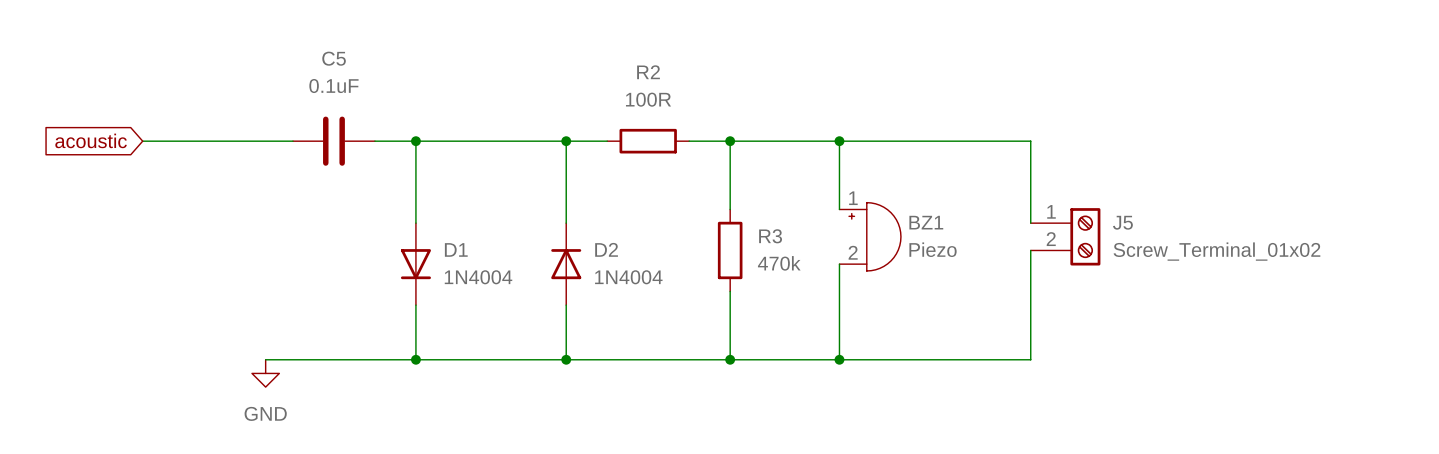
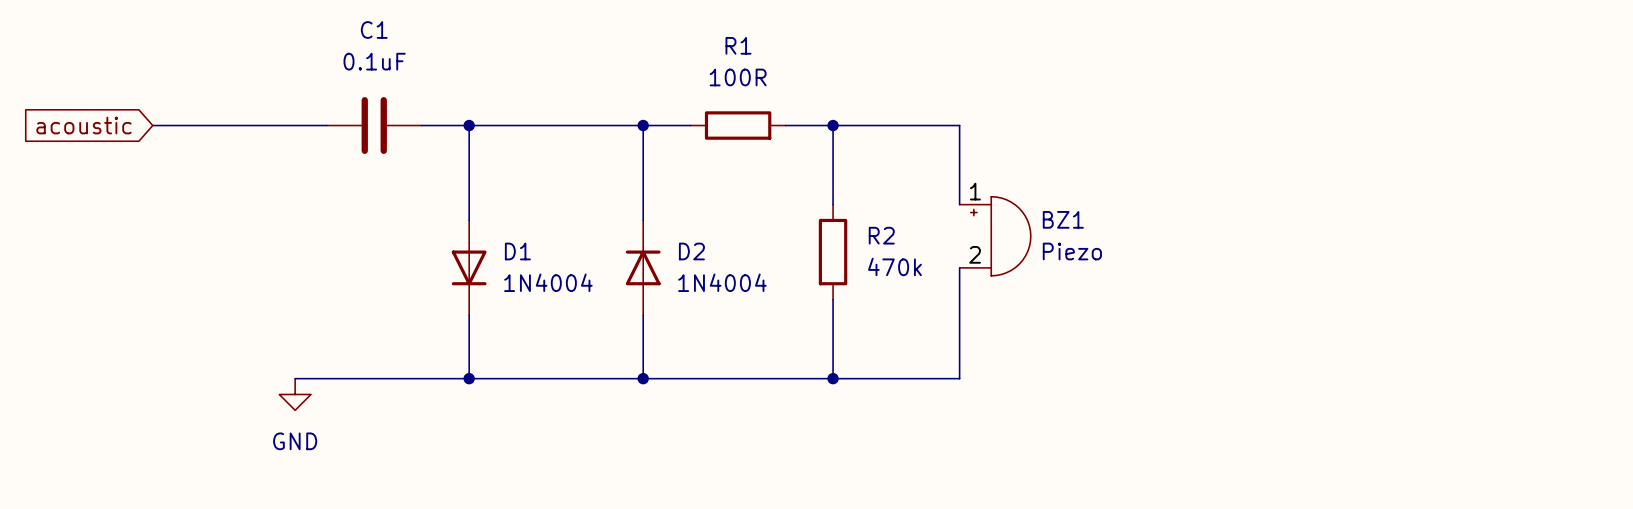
C5 name: C5 (334, 58) -> C1 (374, 30)
R2 name: R2 (648, 72) -> R1 (738, 45)
wire: (839, 141) (1030, 141) (1030, 223) -> none
junction: (839, 141) -> none
R3 name: R3 (770, 236) -> R2 (881, 235)
J5: Screw_Terminal_01x02 (1065, 236) -> none
wire: (1030, 250) (1030, 359) (839, 359) -> none
junction: (839, 359) -> none

